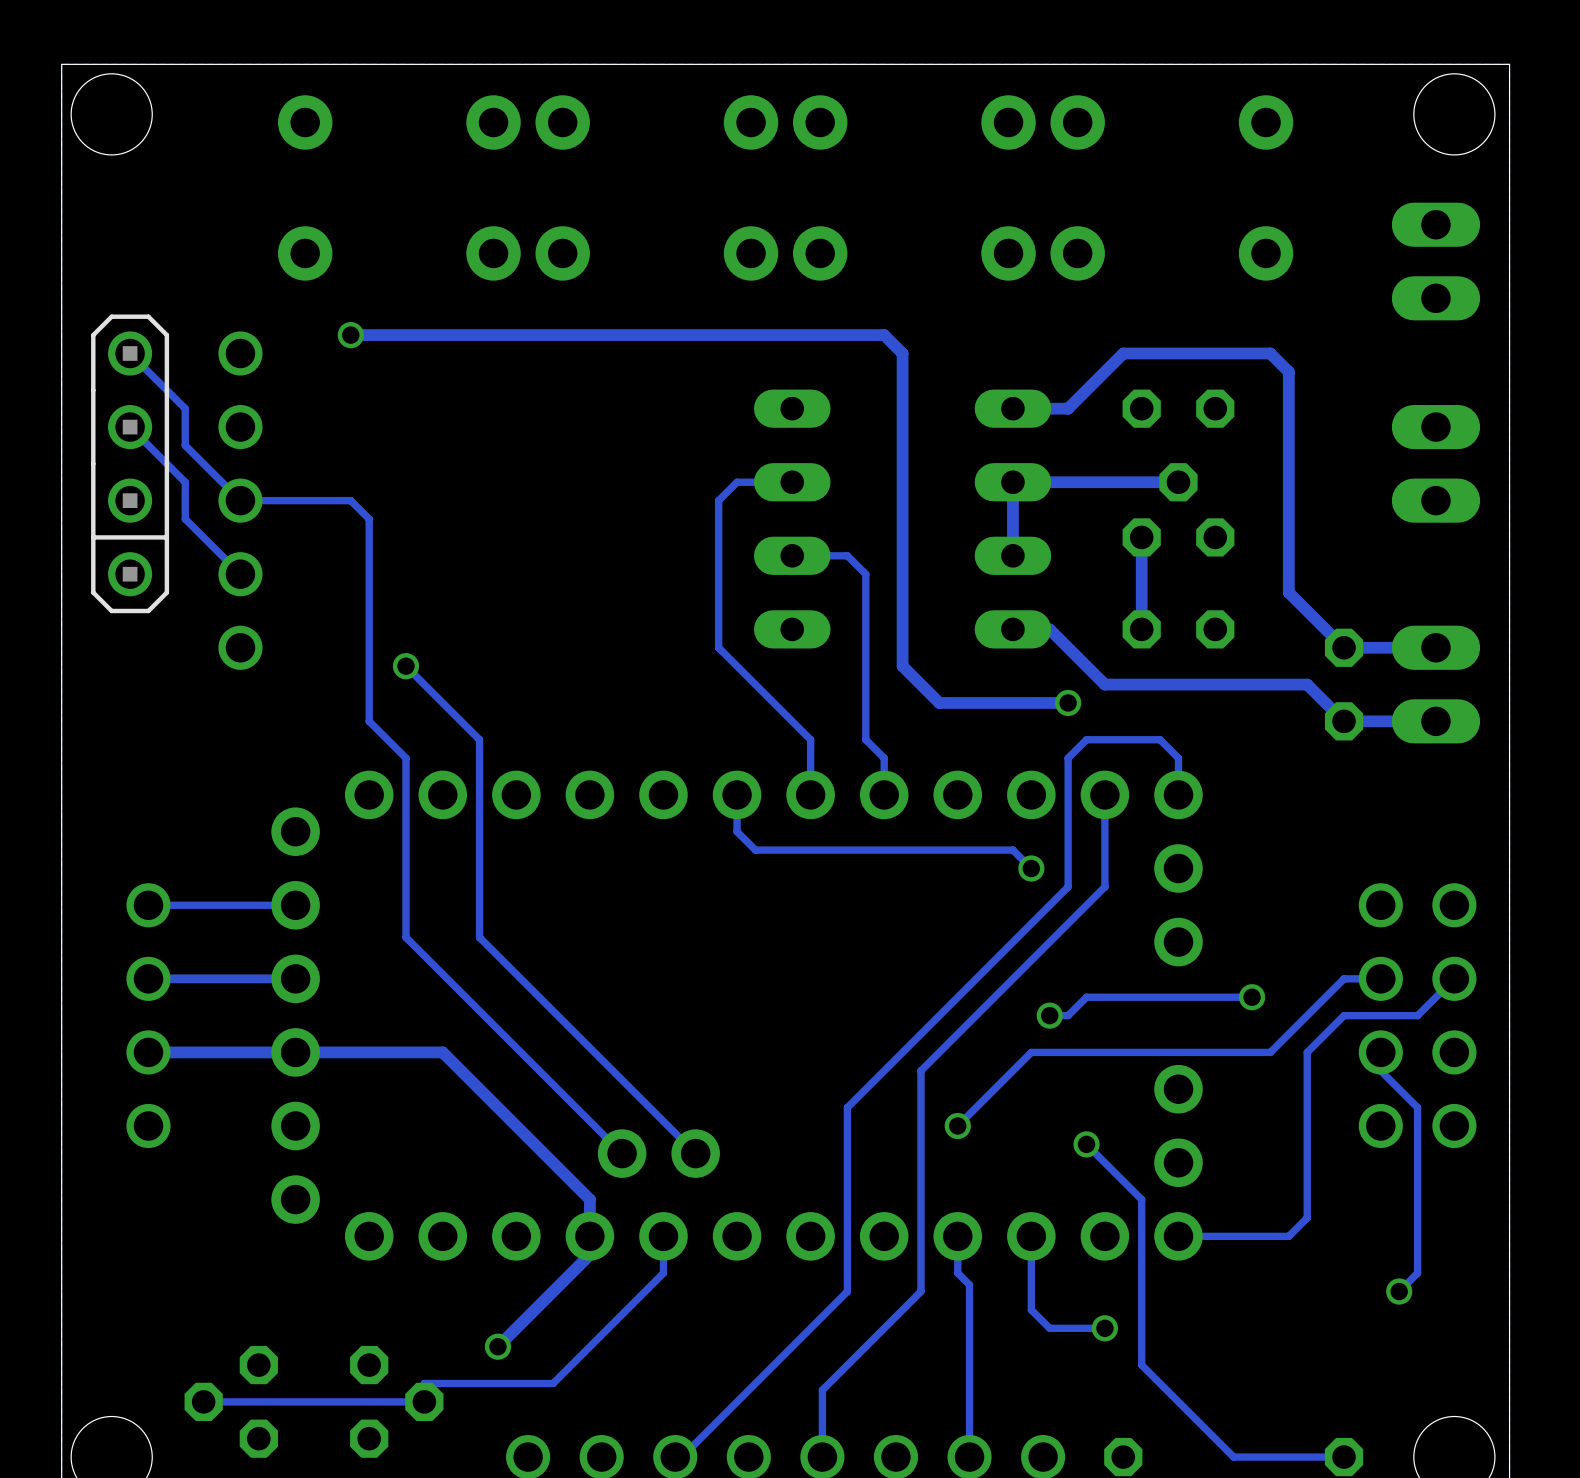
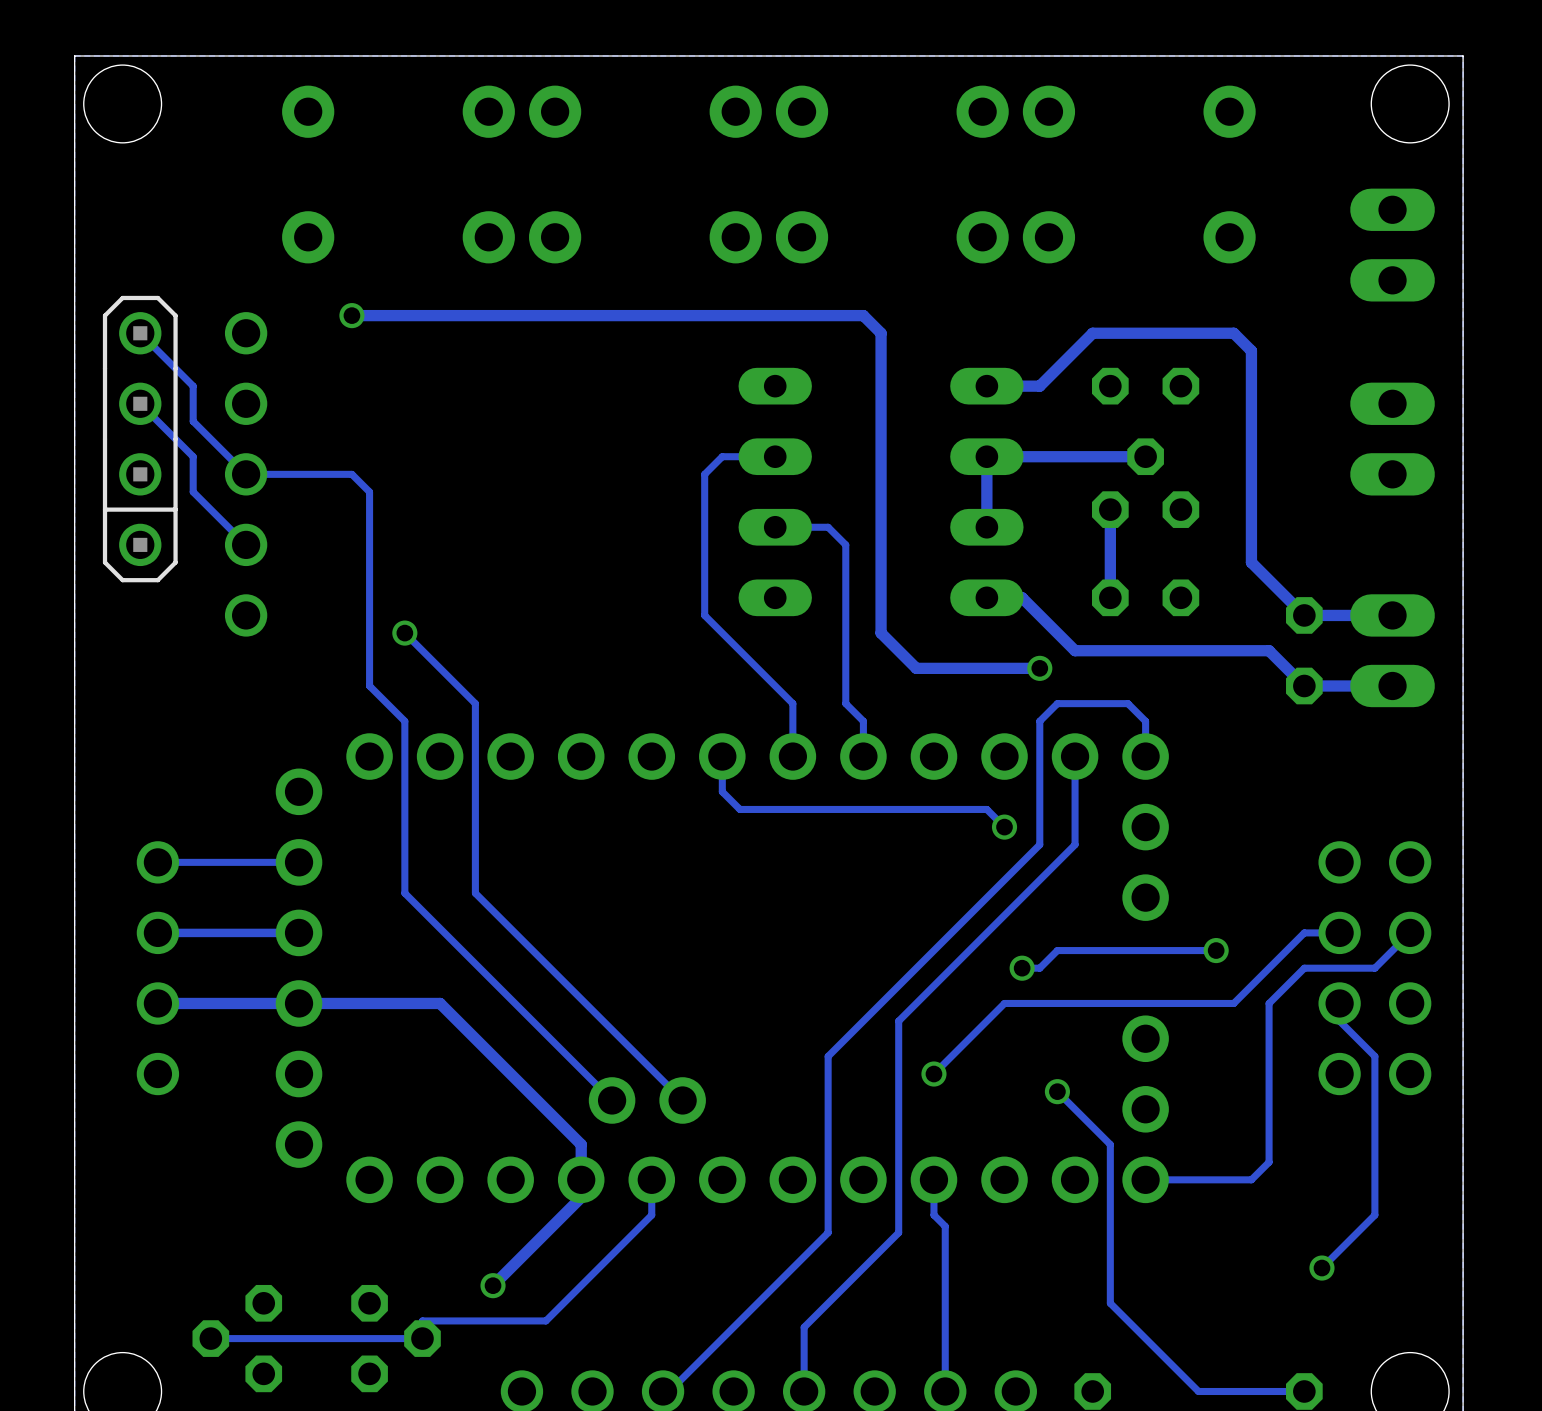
track: (1031, 1236) (1031, 1309) (1049, 1328) (1104, 1328) -> none
track: none -> (1357, 1232) (1321, 1268)
via position: (1399, 1291) -> (1321, 1268)
via: (1104, 1328) -> none

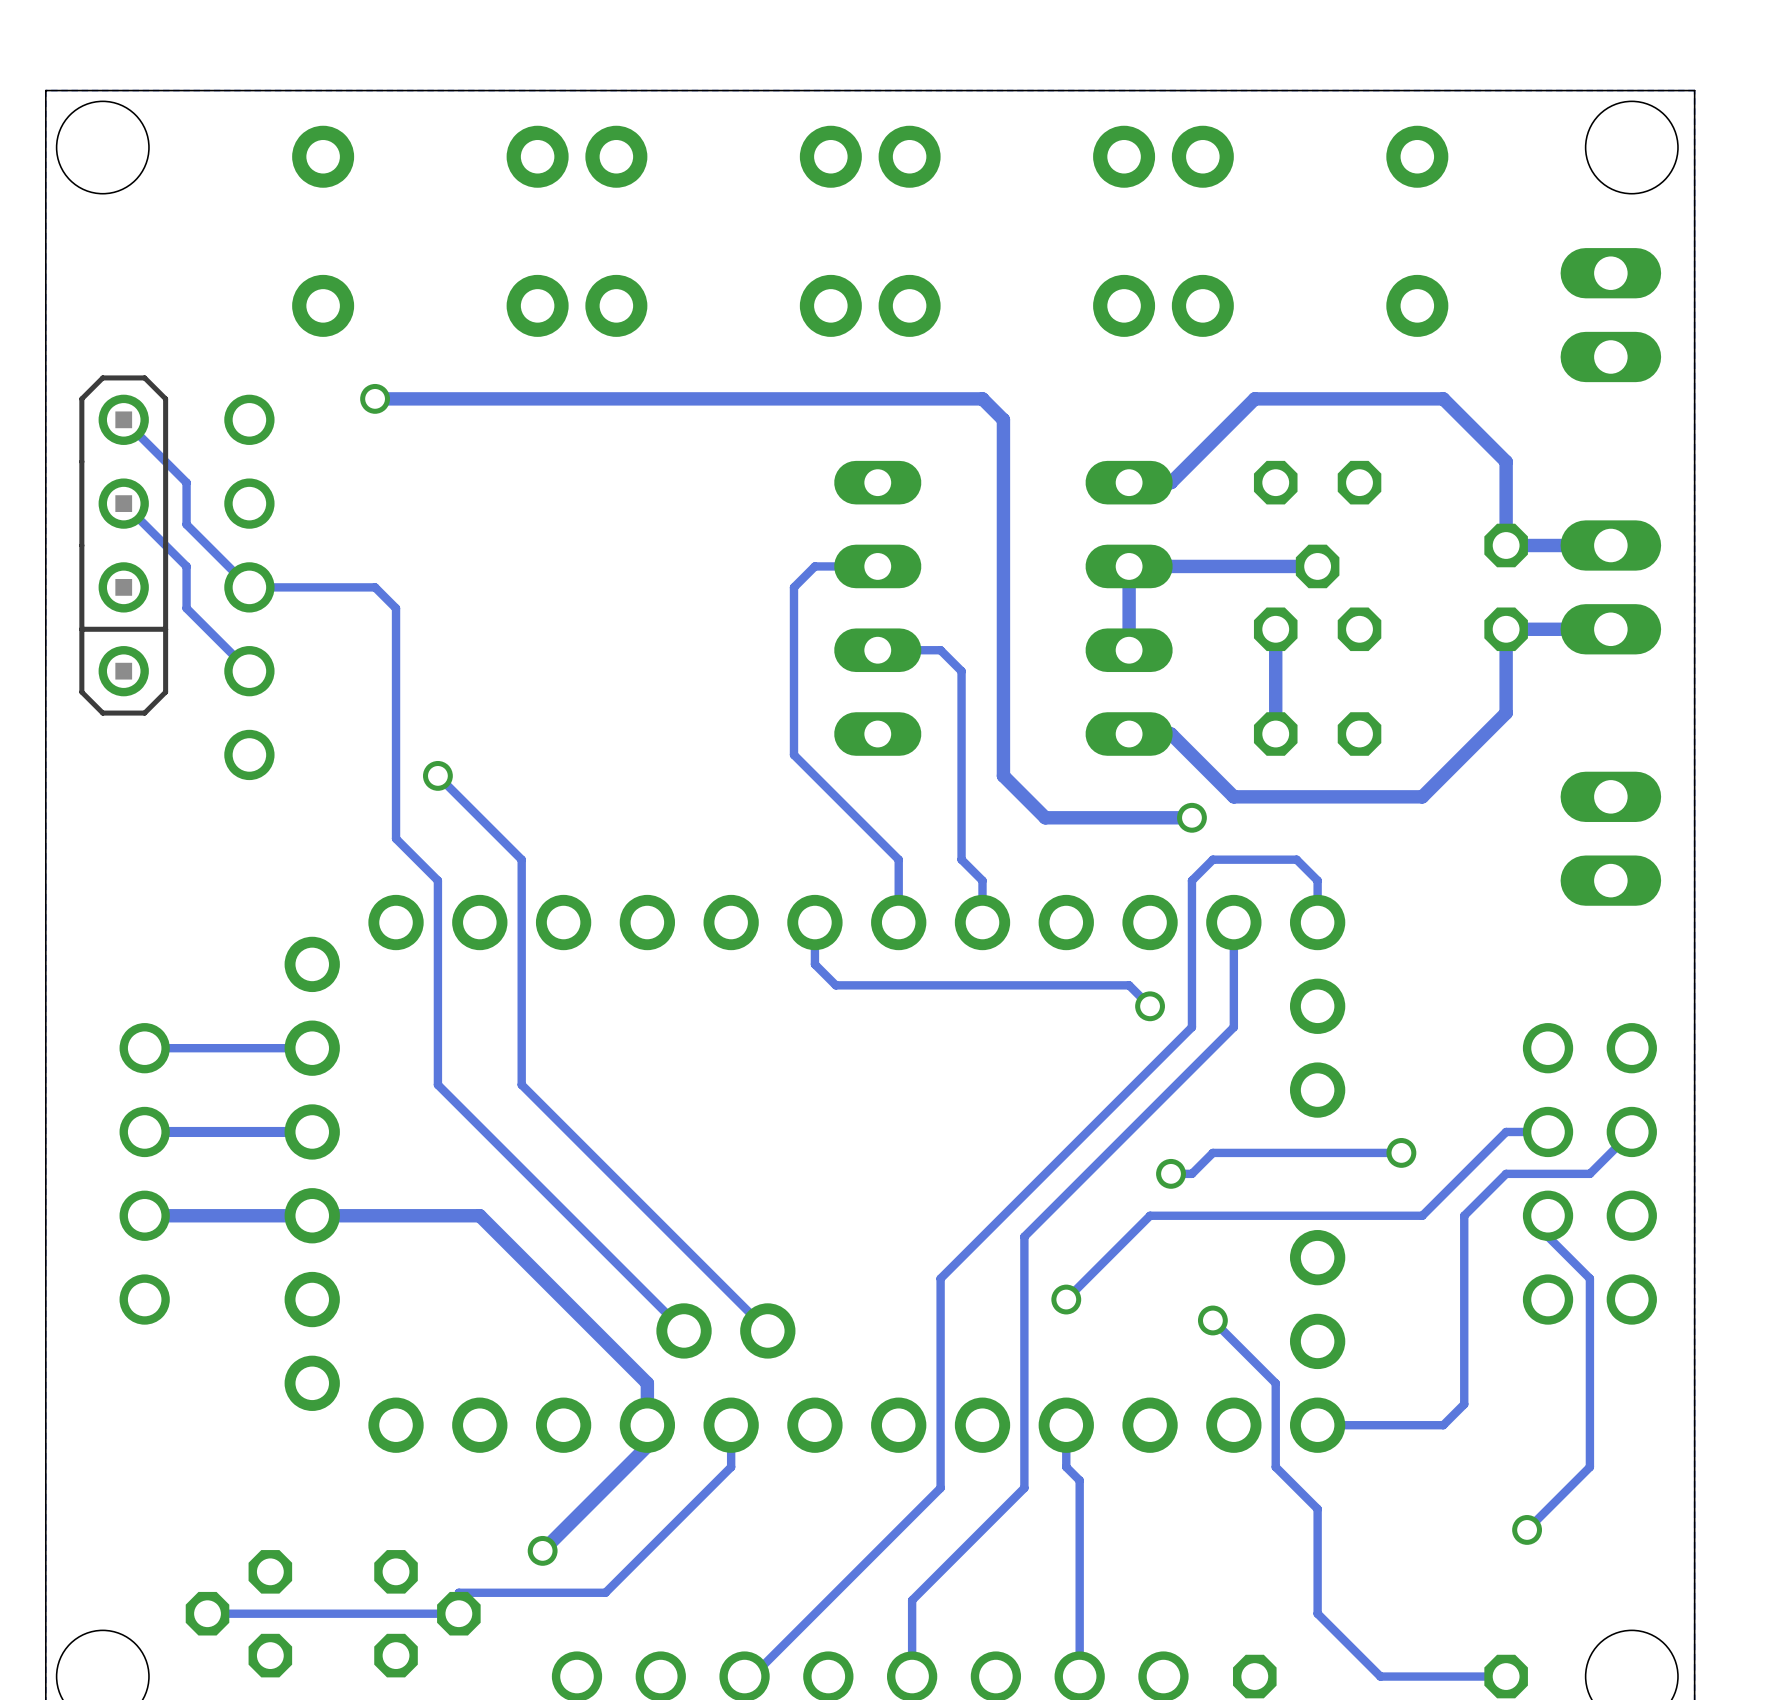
track: (1022, 386) (1039, 386) (1092, 333) (1233, 333) (1251, 350) (1251, 562) (1304, 615) (1392, 615) -> (1171, 482) (1254, 398) (1443, 398) (1506, 461) (1506, 545) (1610, 545)
part position: (1392, 439) -> (1610, 587)
track: (1233, 650) (1269, 650) (1304, 685) (1392, 685) -> (1422, 796) (1506, 713) (1506, 629) (1610, 629)
part position: (1304, 650) -> (1506, 587)
part position: (1392, 650) -> (1610, 838)
track: (1110, 1215) (1110, 1303) (1145, 1338) -> (1275, 1467) (1317, 1508) (1317, 1613)

